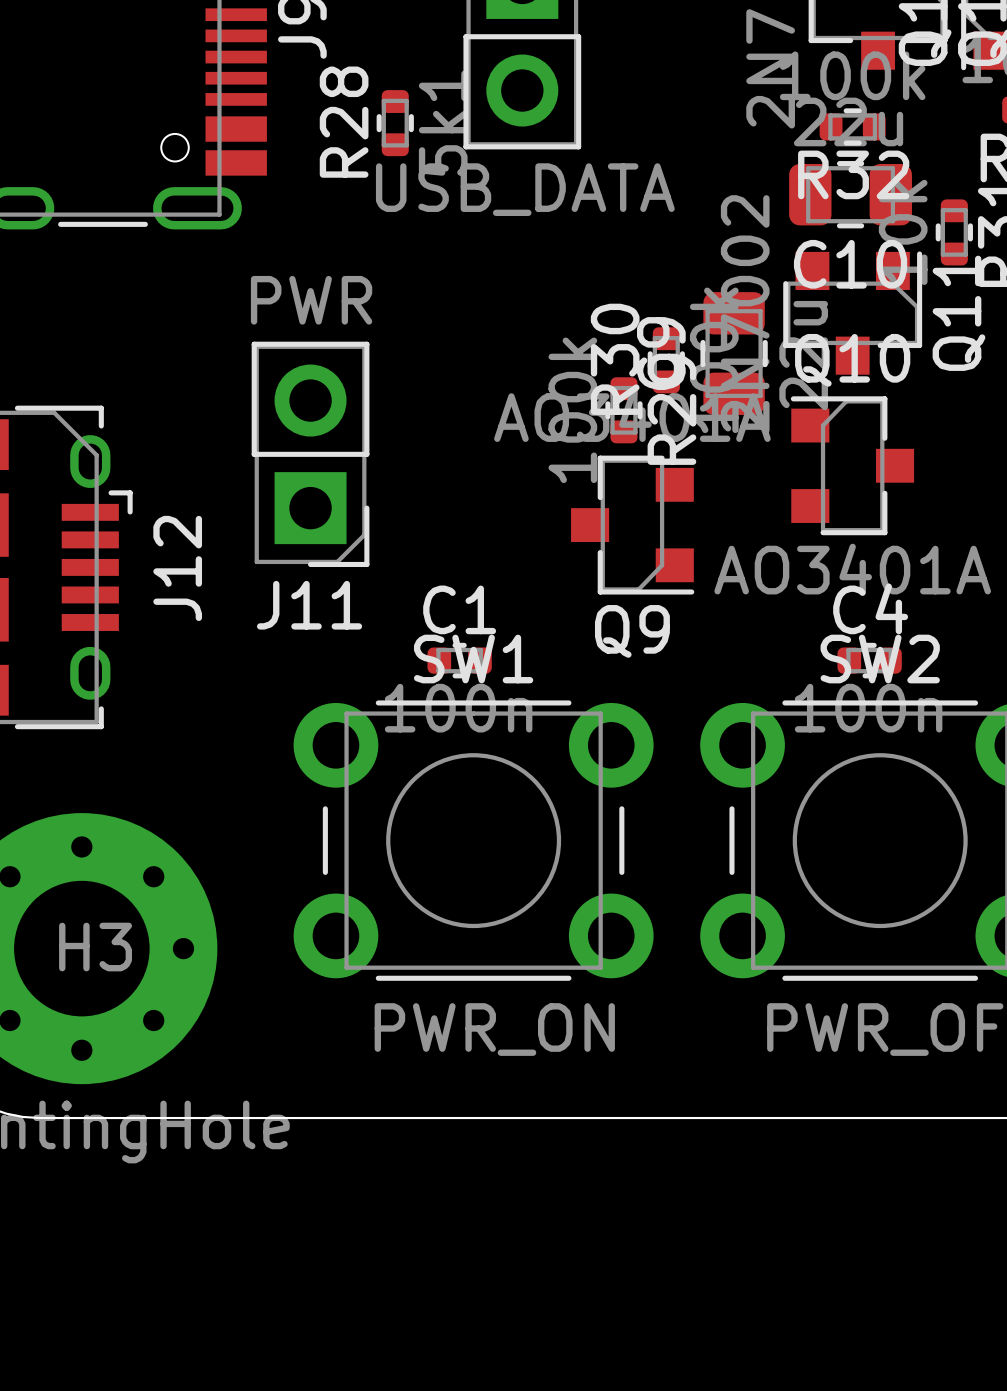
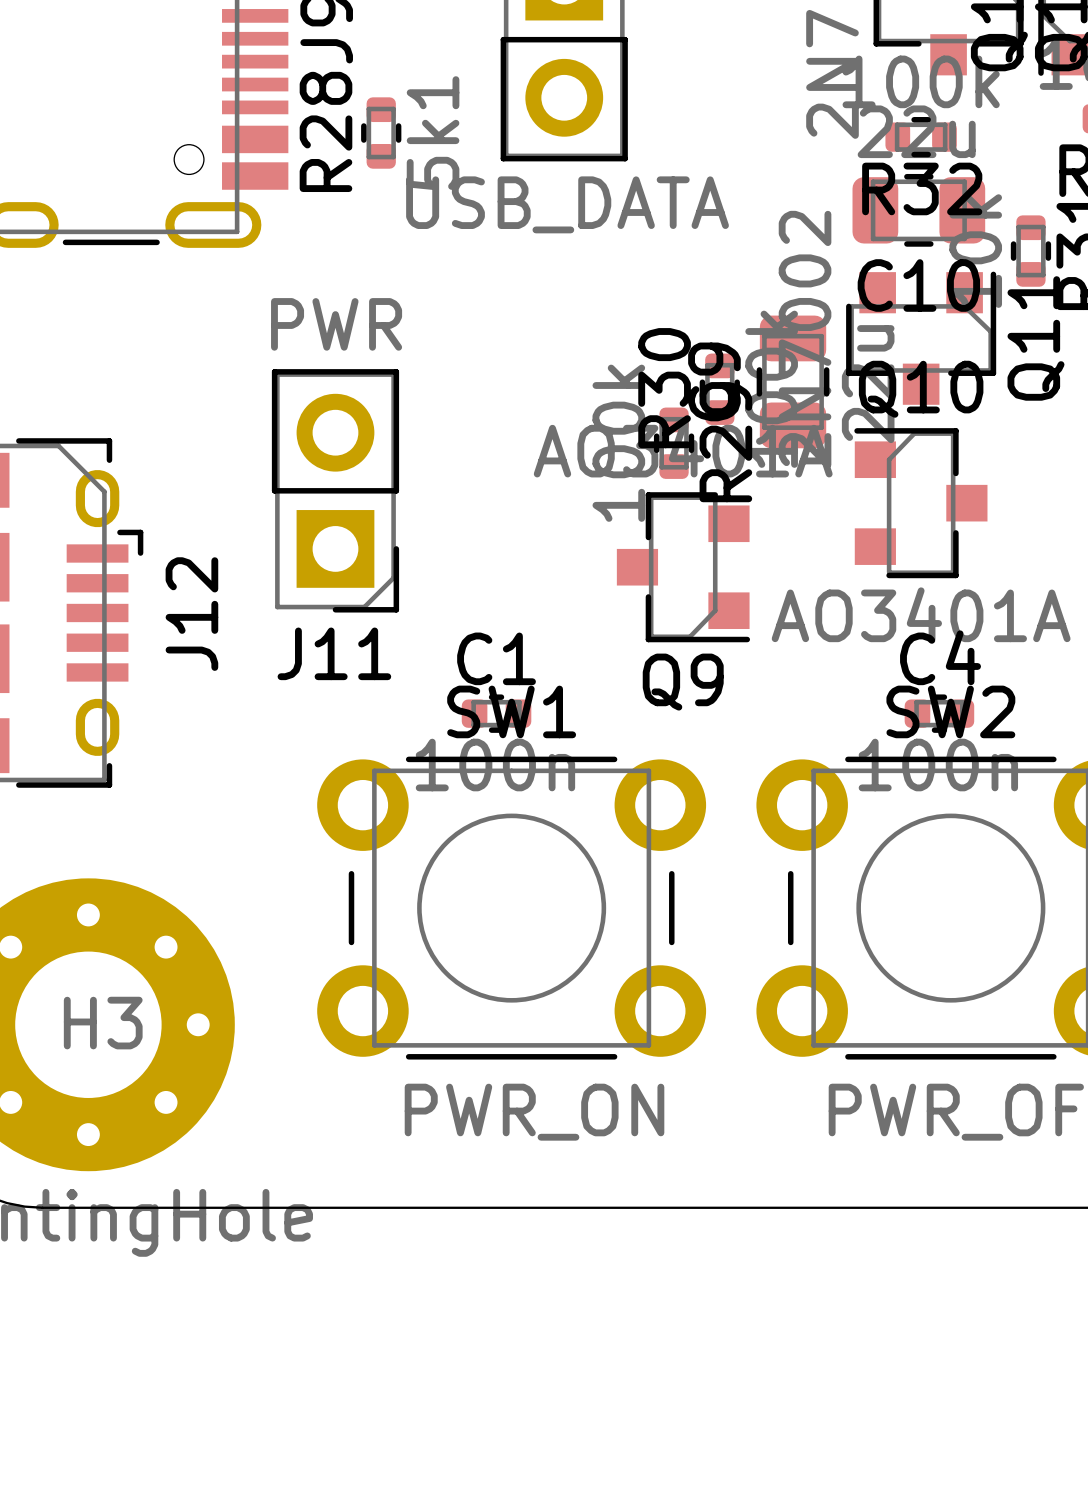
R28 position: (395, 123) -> (381, 133)

